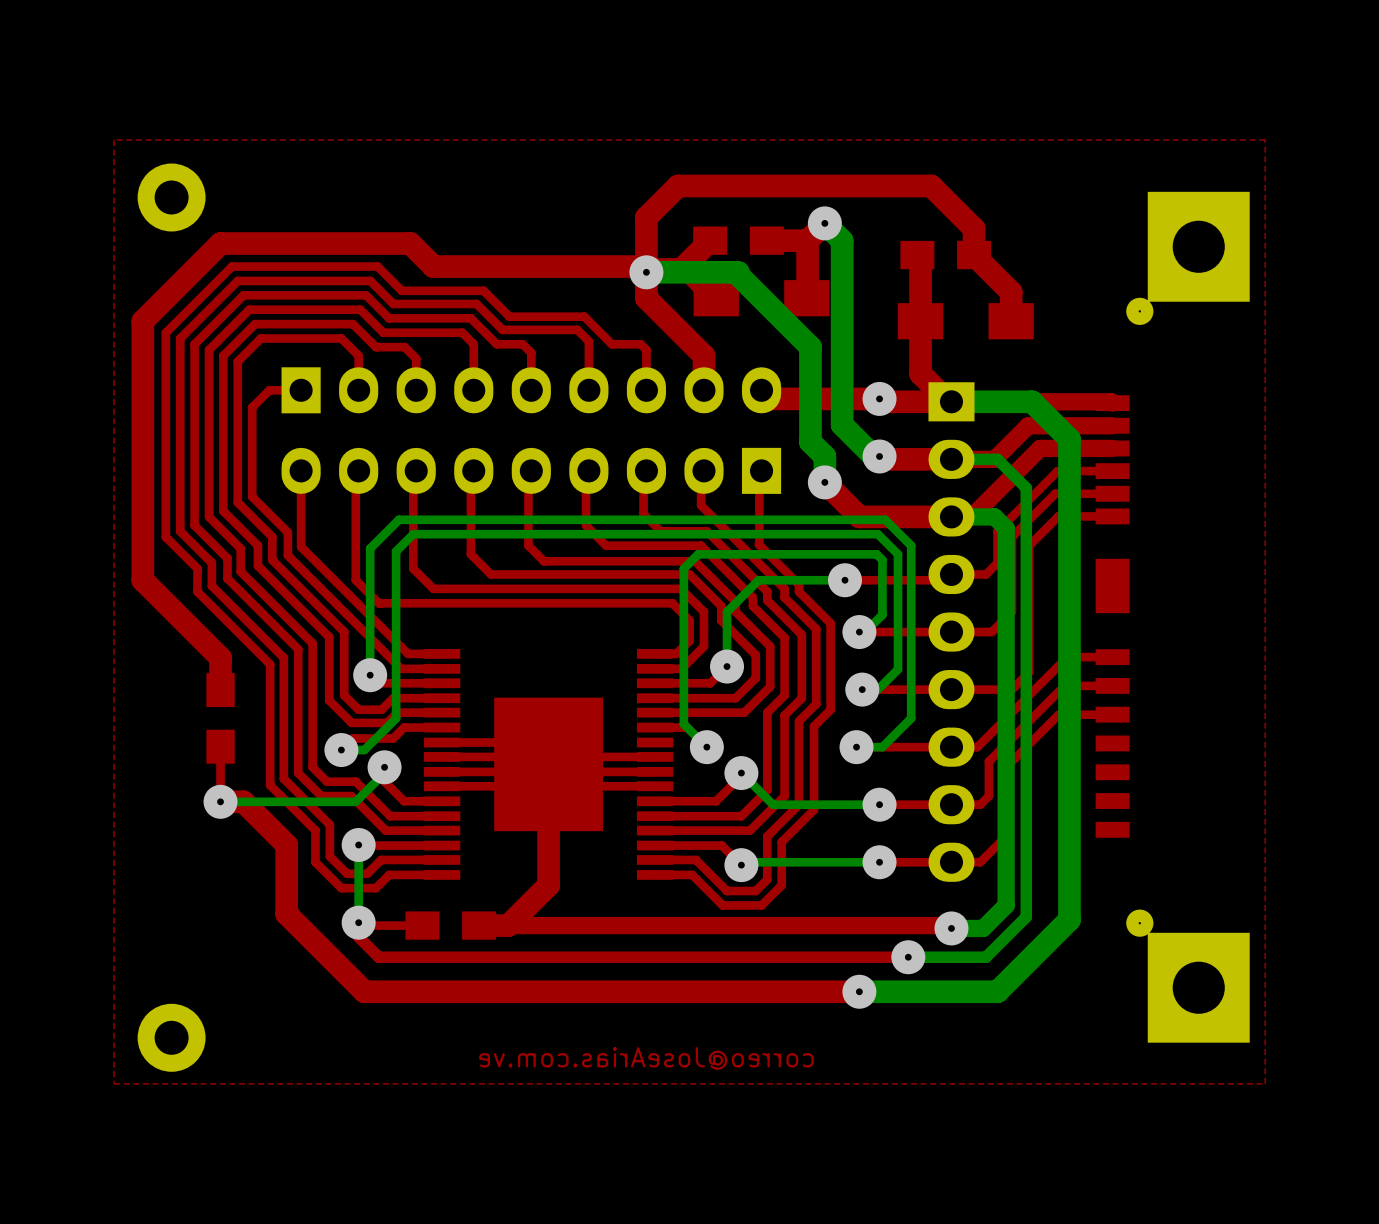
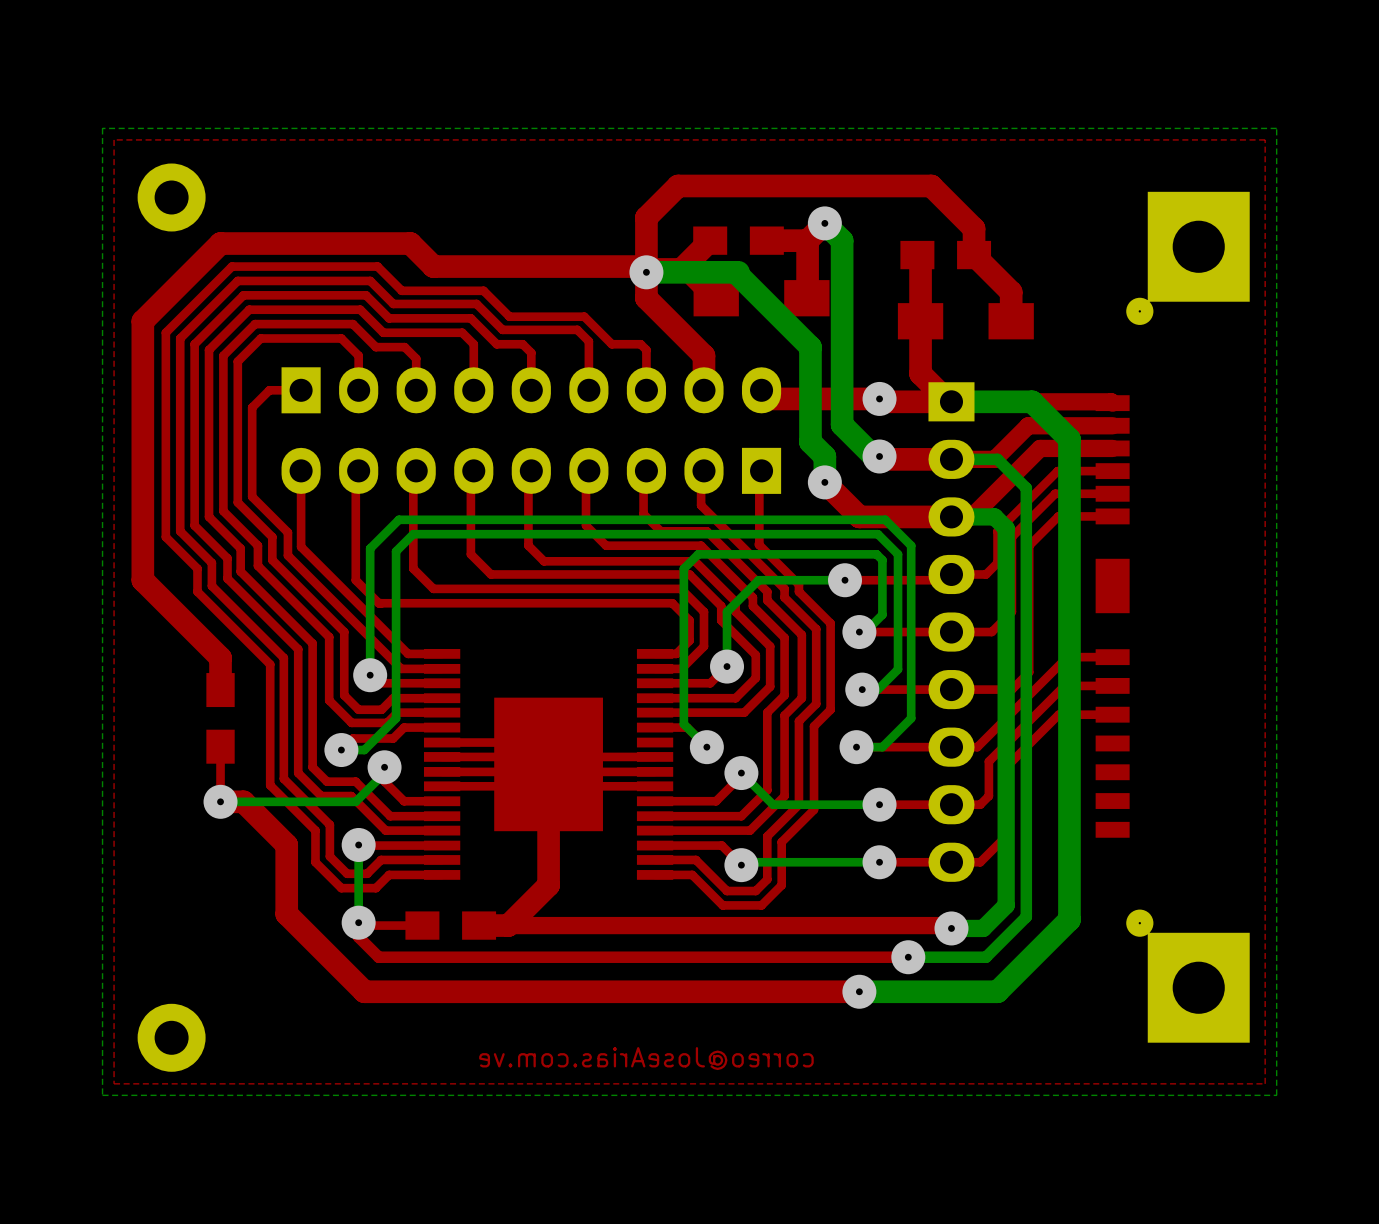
bottom zone outline: none -> (1276, 128) (1276, 1095) (102, 1095) (102, 128) (1276, 128)

